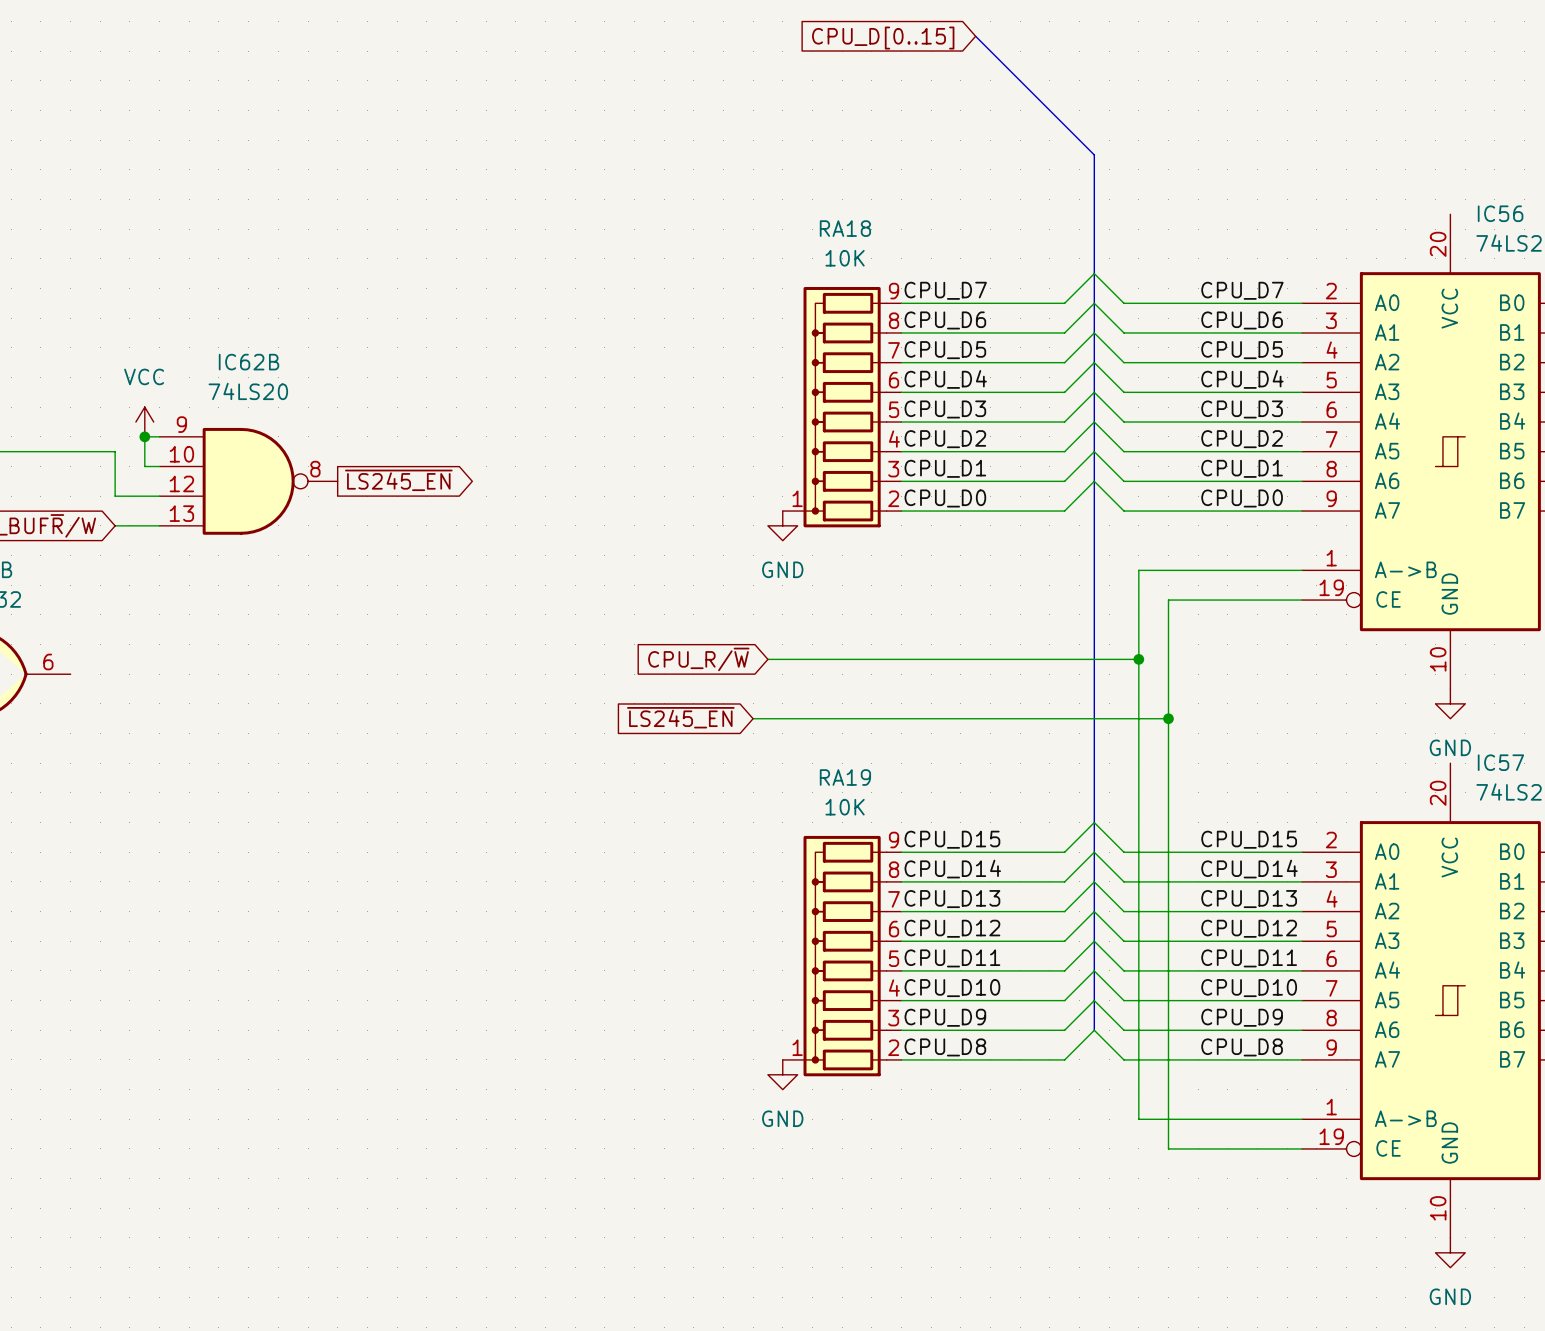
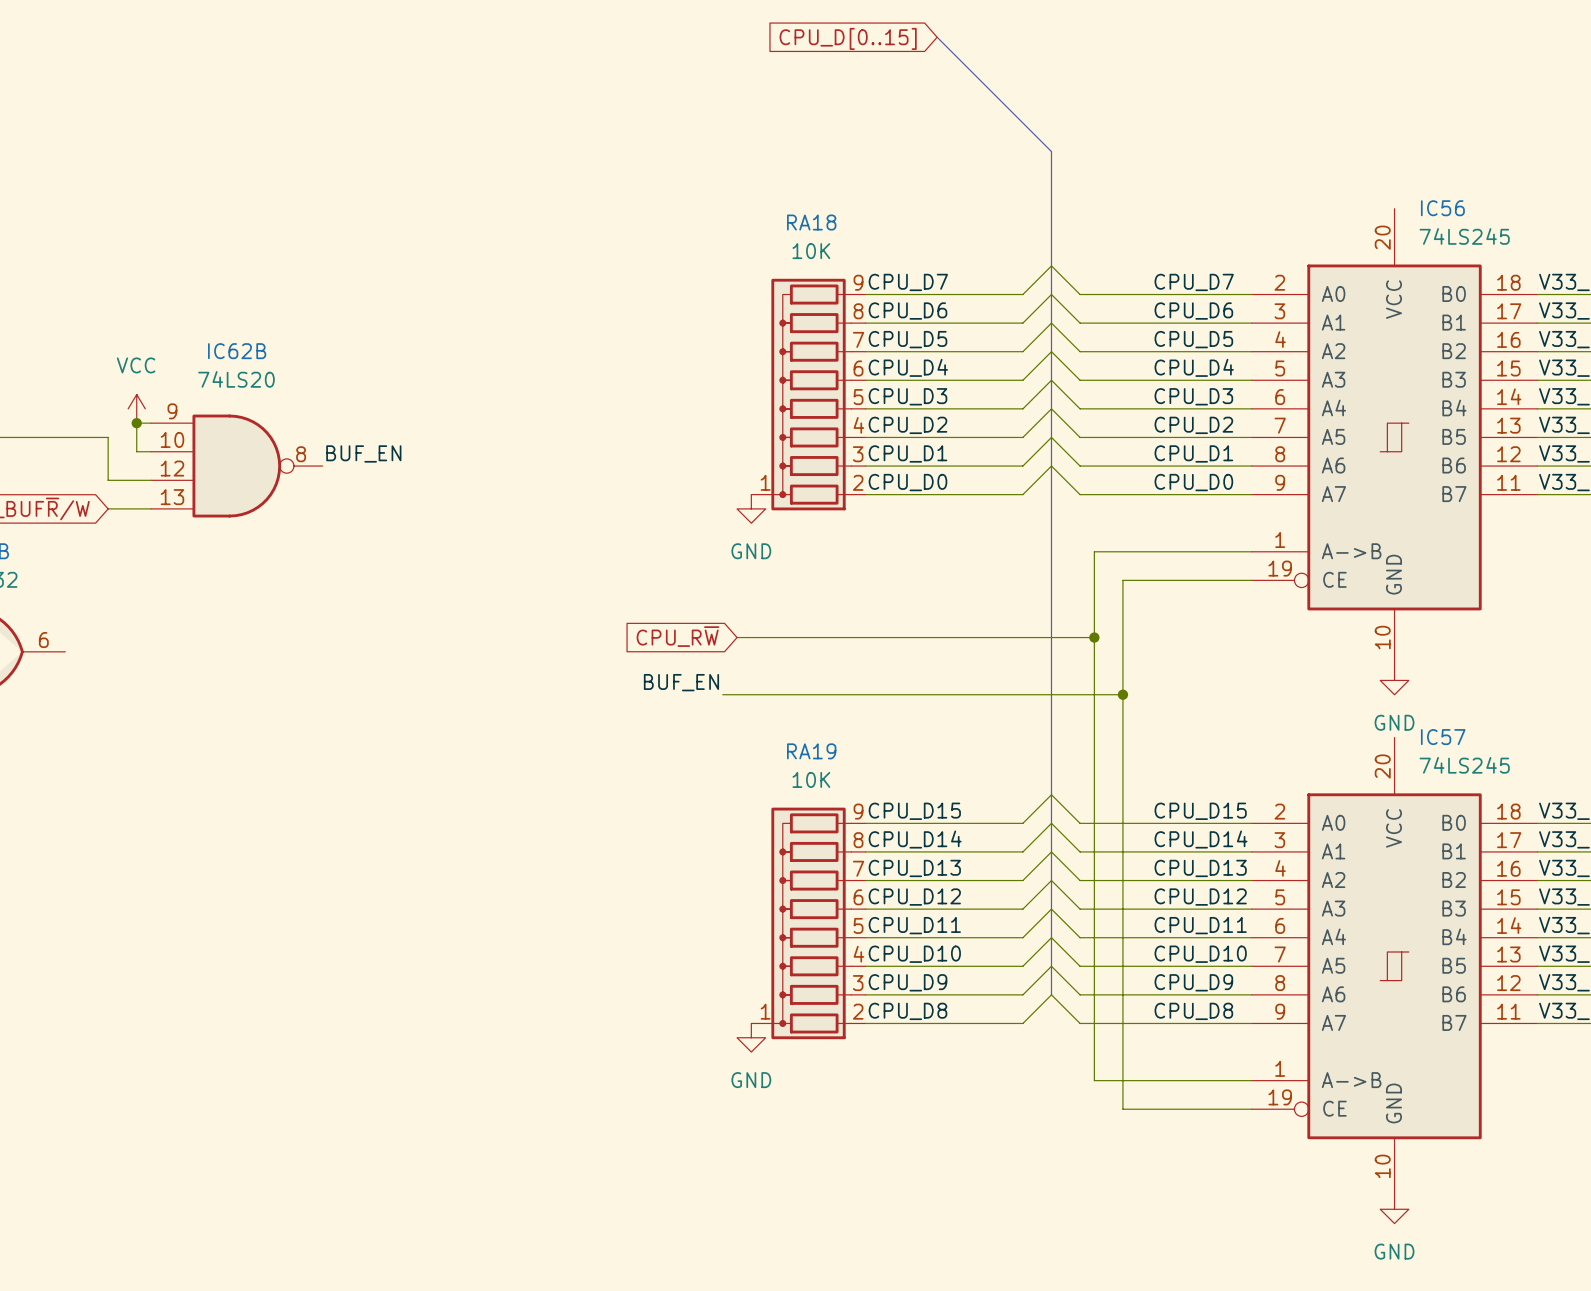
label: none -> BUF_EN (363, 453)
global label: ~{LS245_EN} (398, 480) -> none
global label: CPU_R/~{W} (698, 659) -> CPU_R~{W} (677, 636)
label: none -> BUF_EN (681, 682)
global label: ~{LS245_EN} (680, 717) -> none

